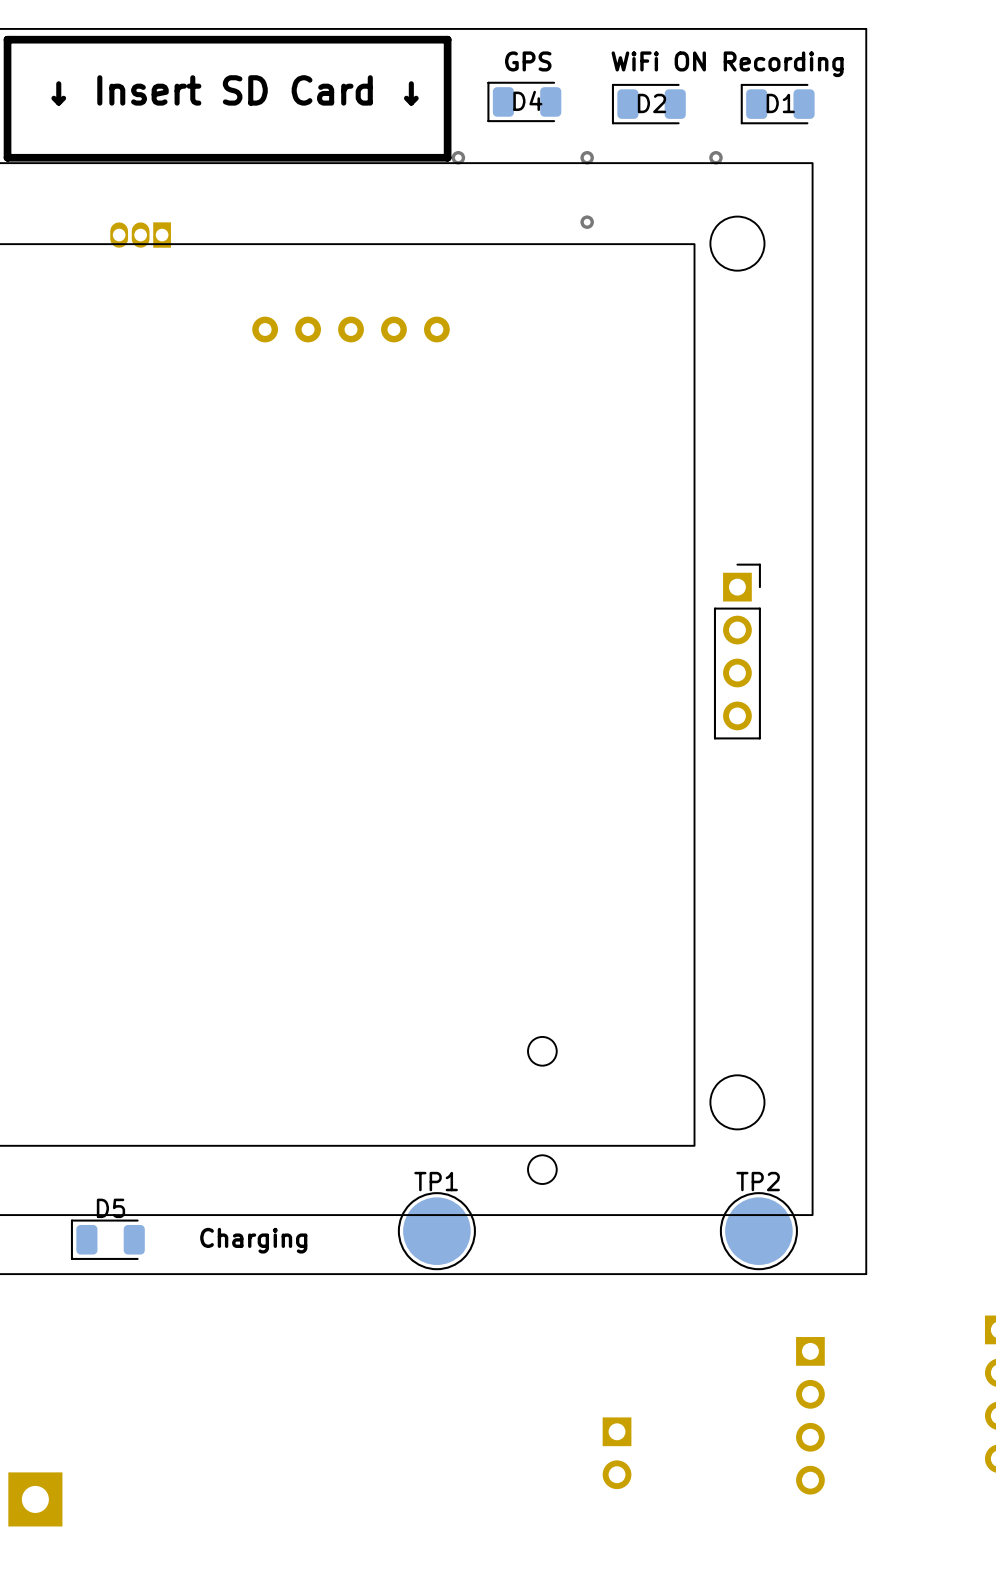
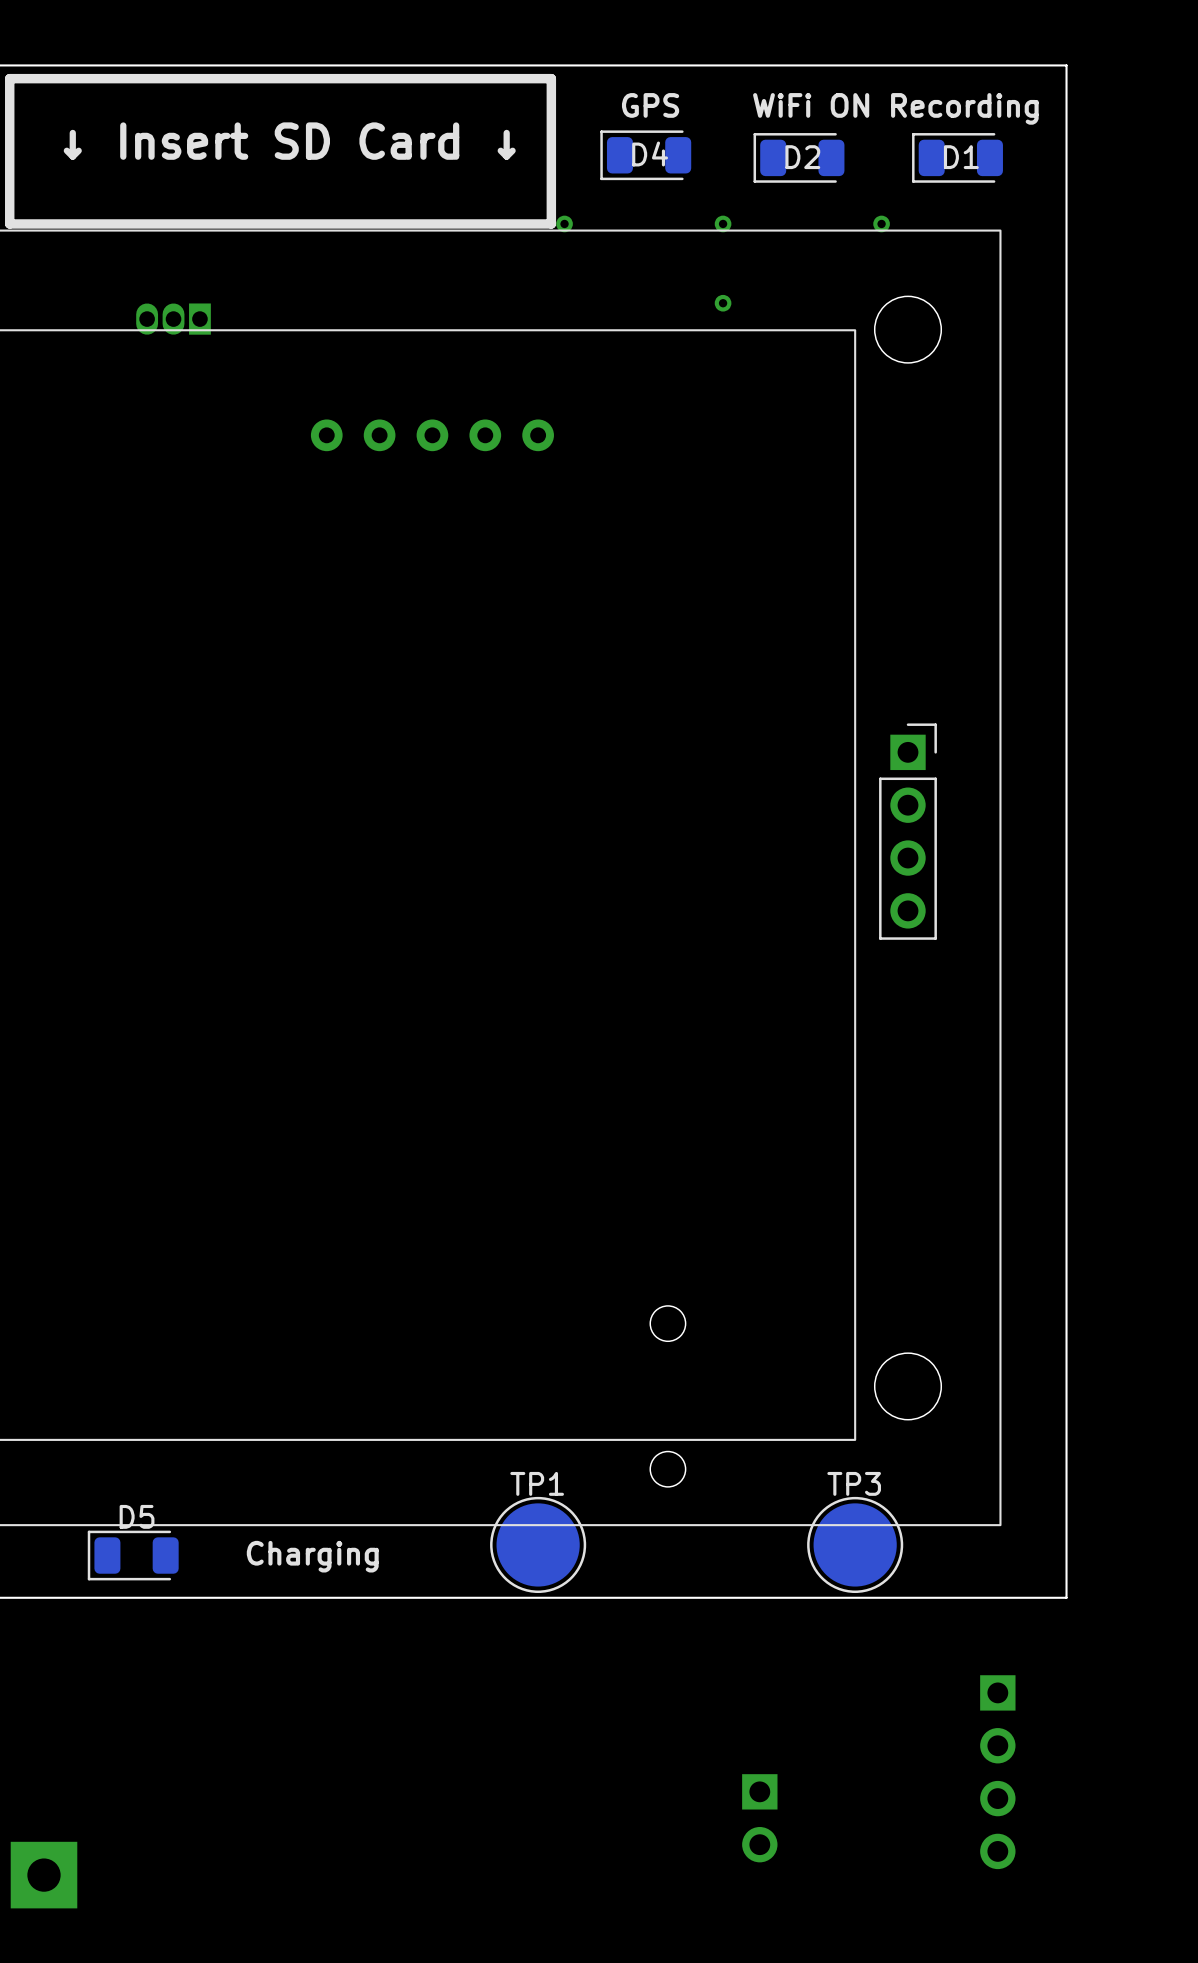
TP3: none -> (855, 1544)
TP2: (758, 1231) -> none

